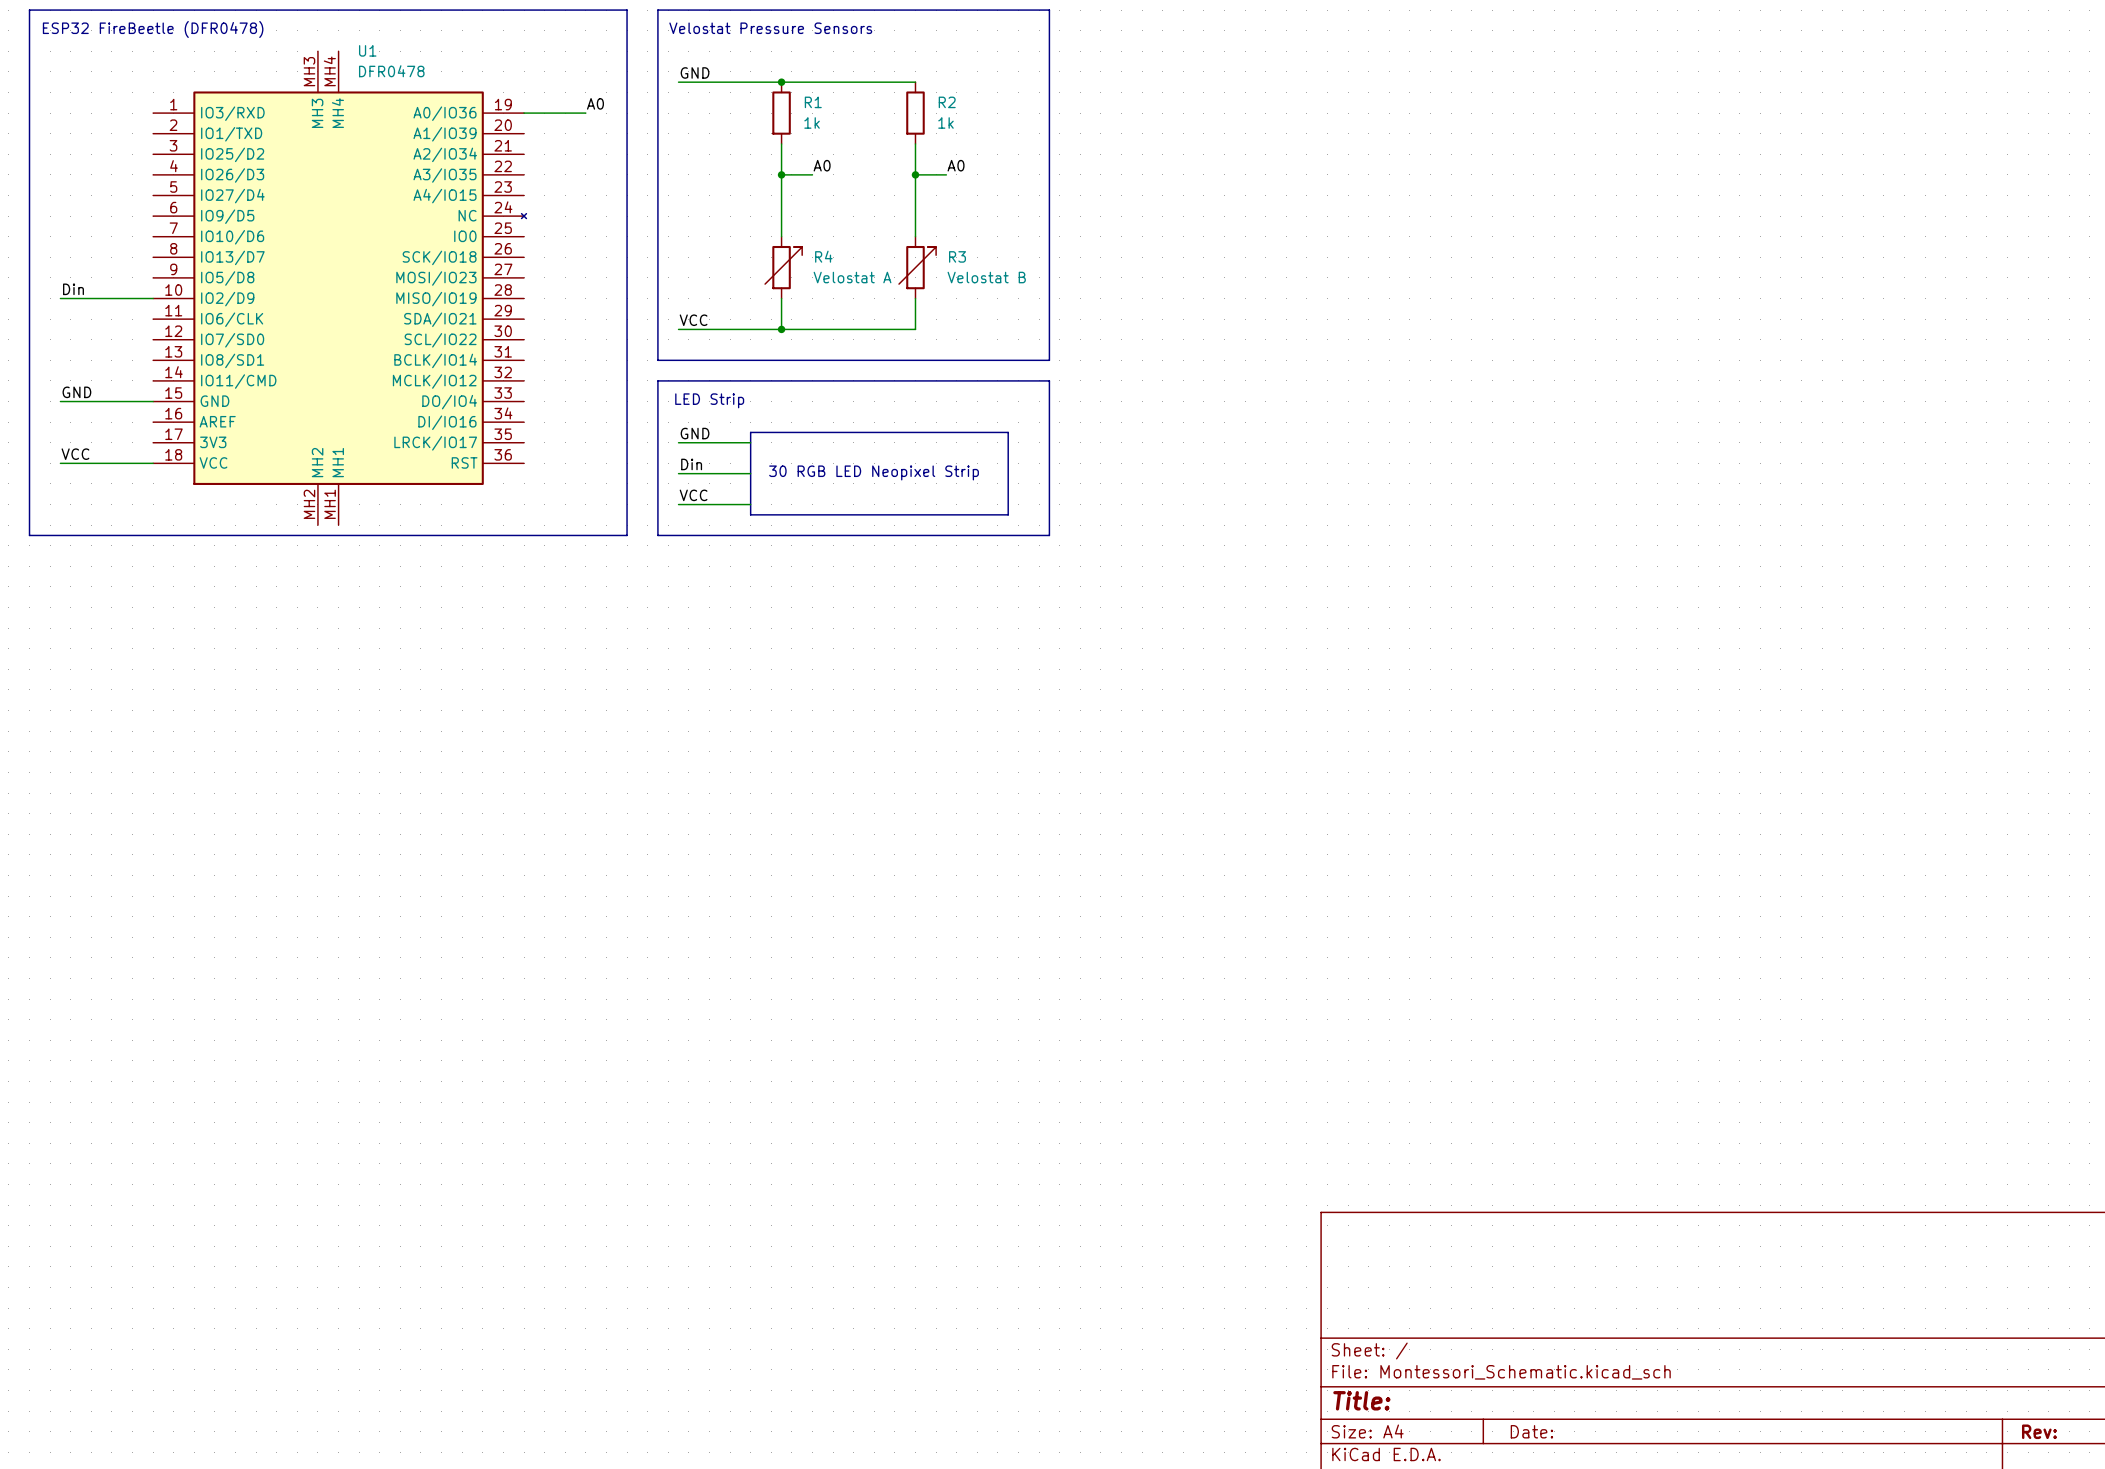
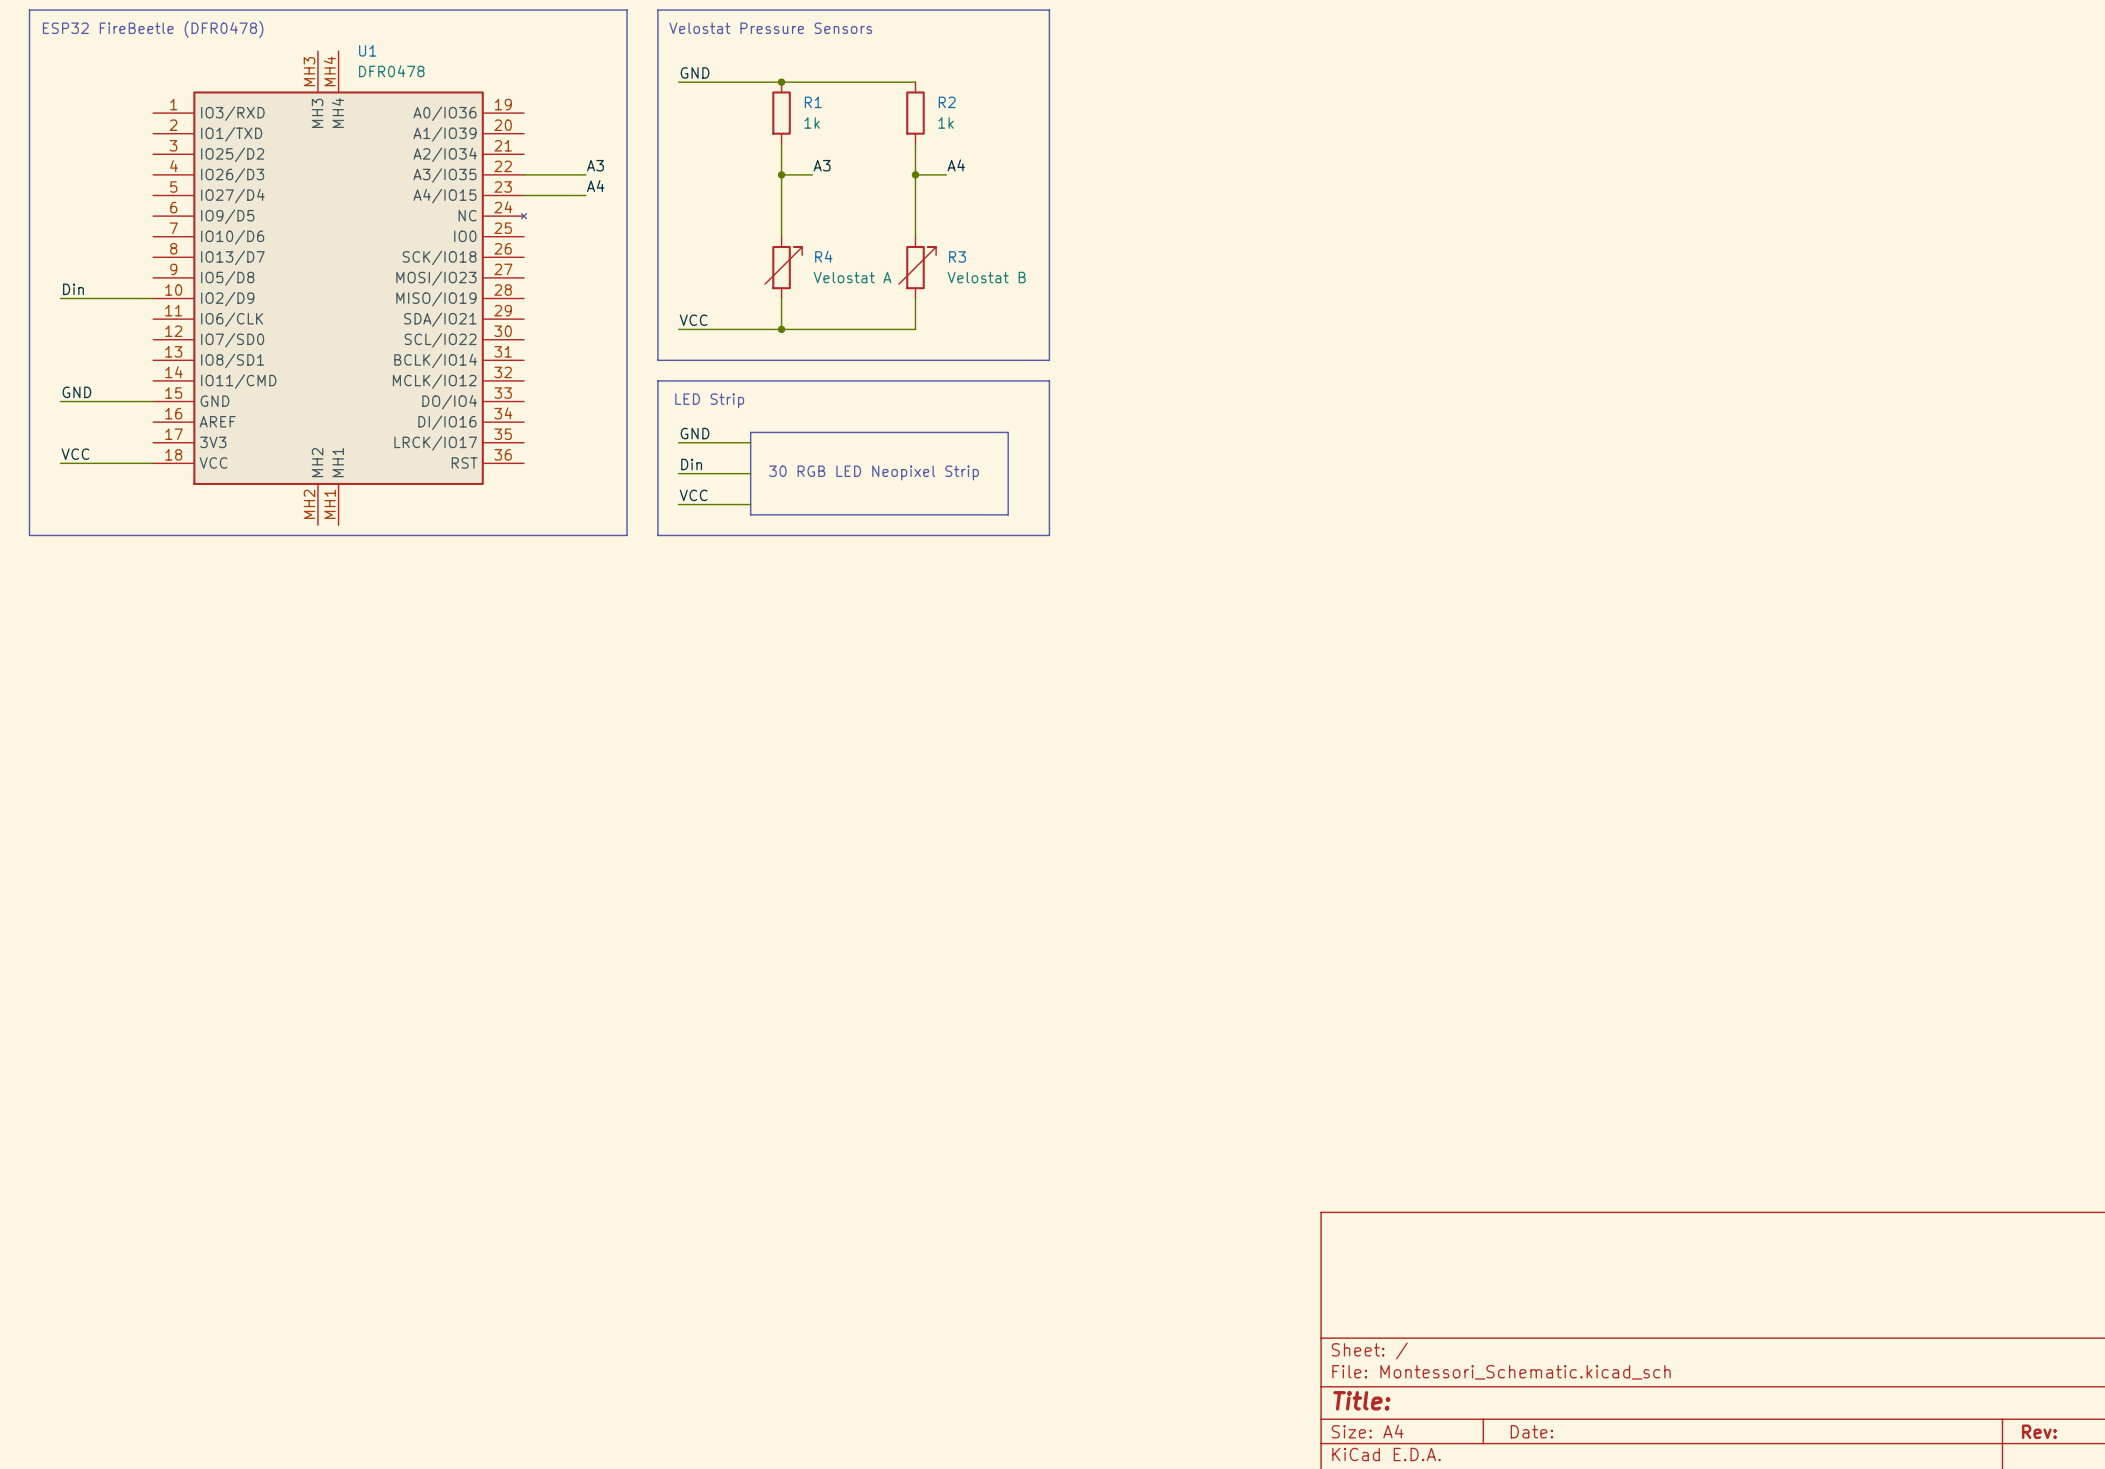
label: A0 (595, 103) -> none
wire: (524, 113) (585, 113) -> (524, 174) (585, 174)
label: none -> A3 (595, 165)
label: A0 (822, 165) -> A3 (822, 165)
label: A0 (956, 165) -> A4 (956, 165)
label: none -> A4 (595, 186)
wire: none -> (524, 195) (585, 195)

